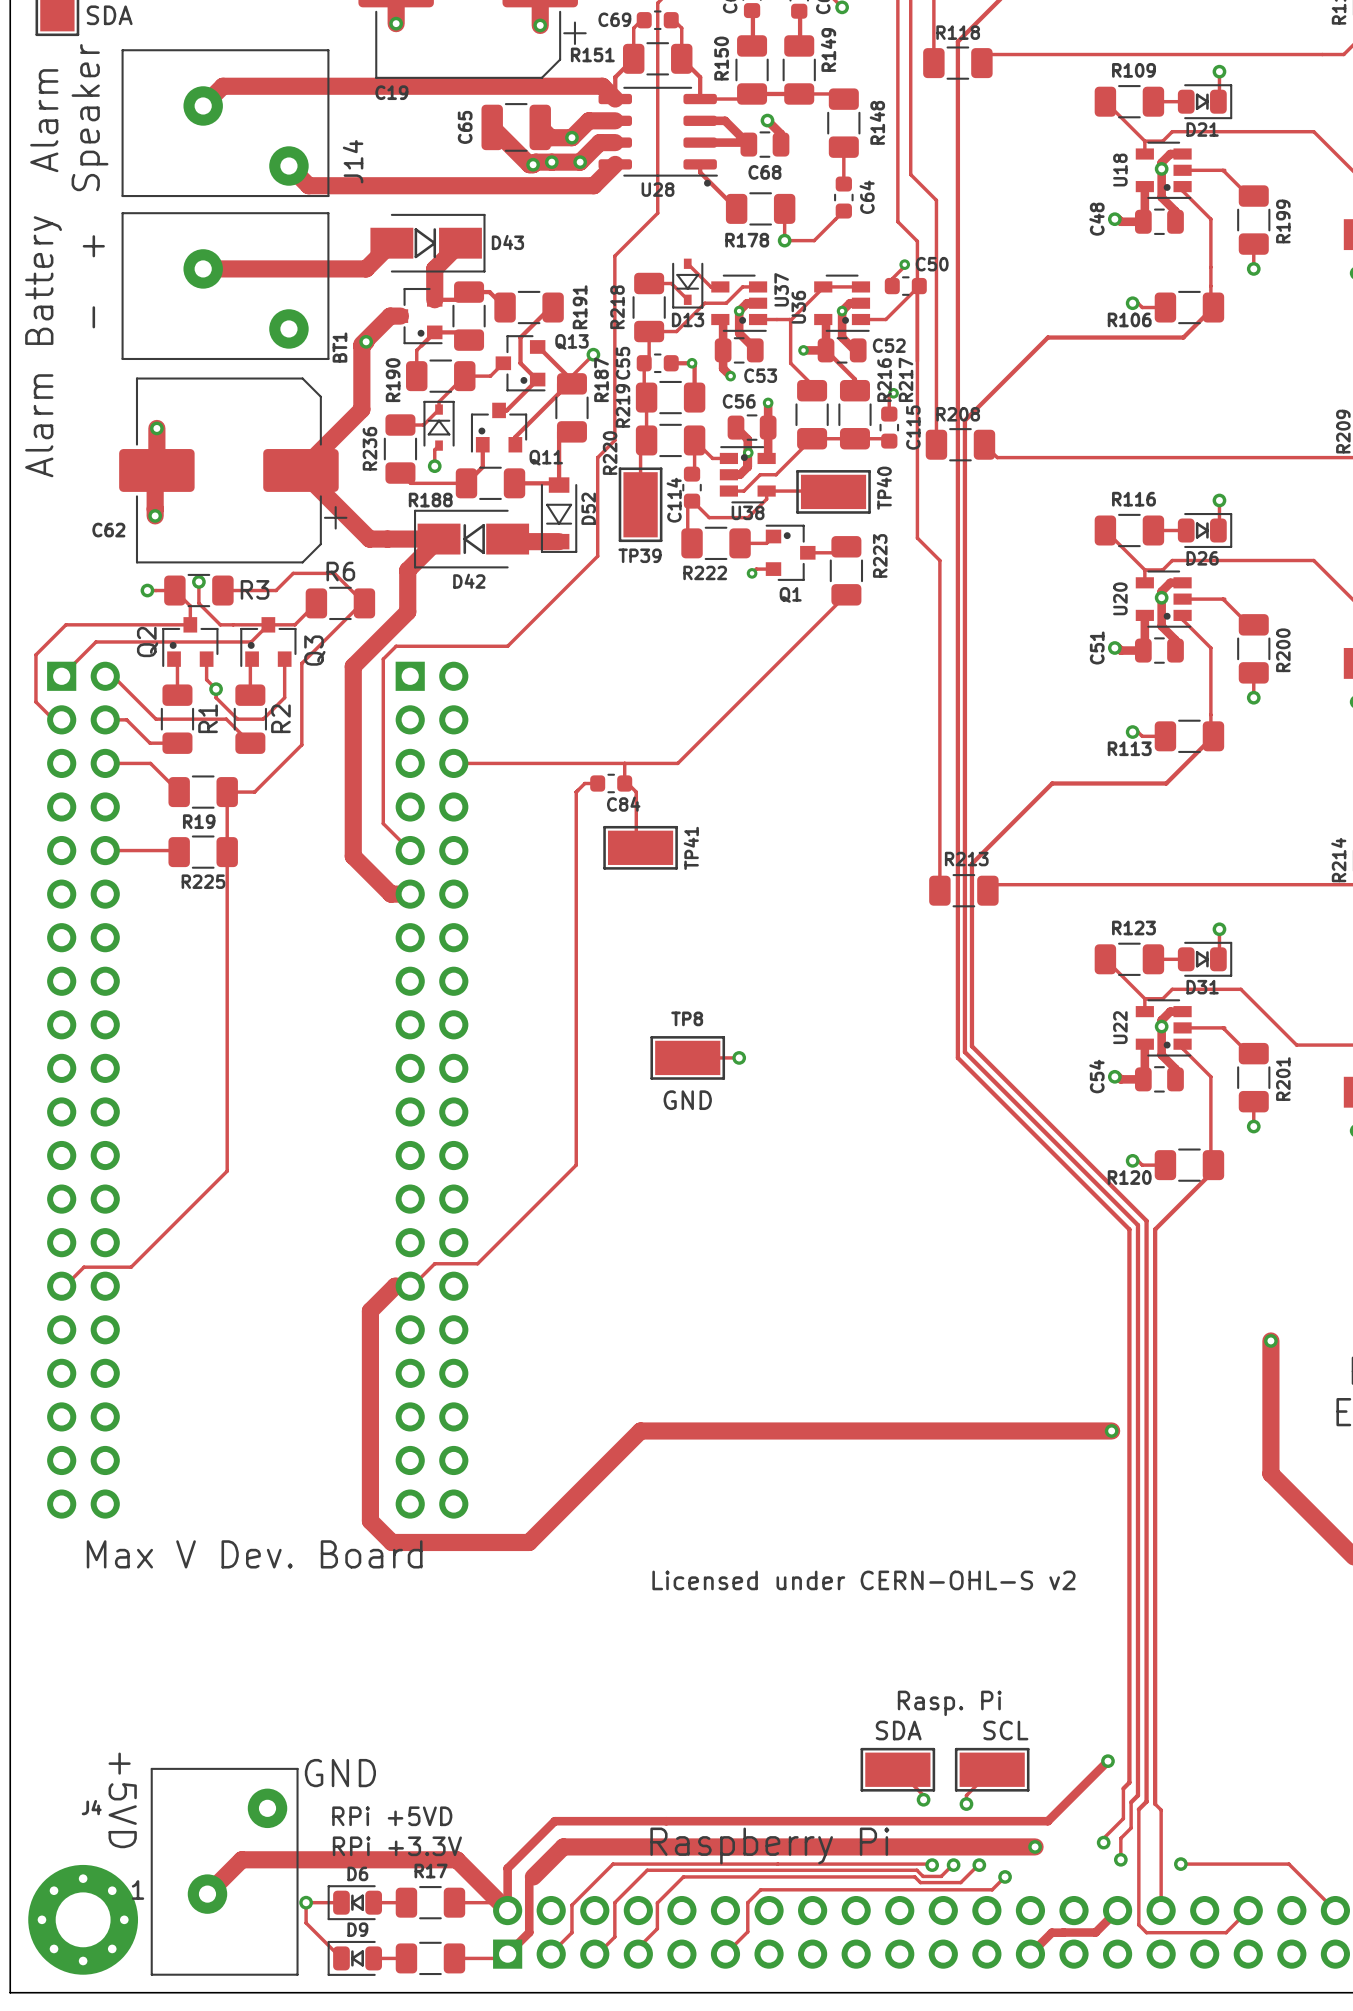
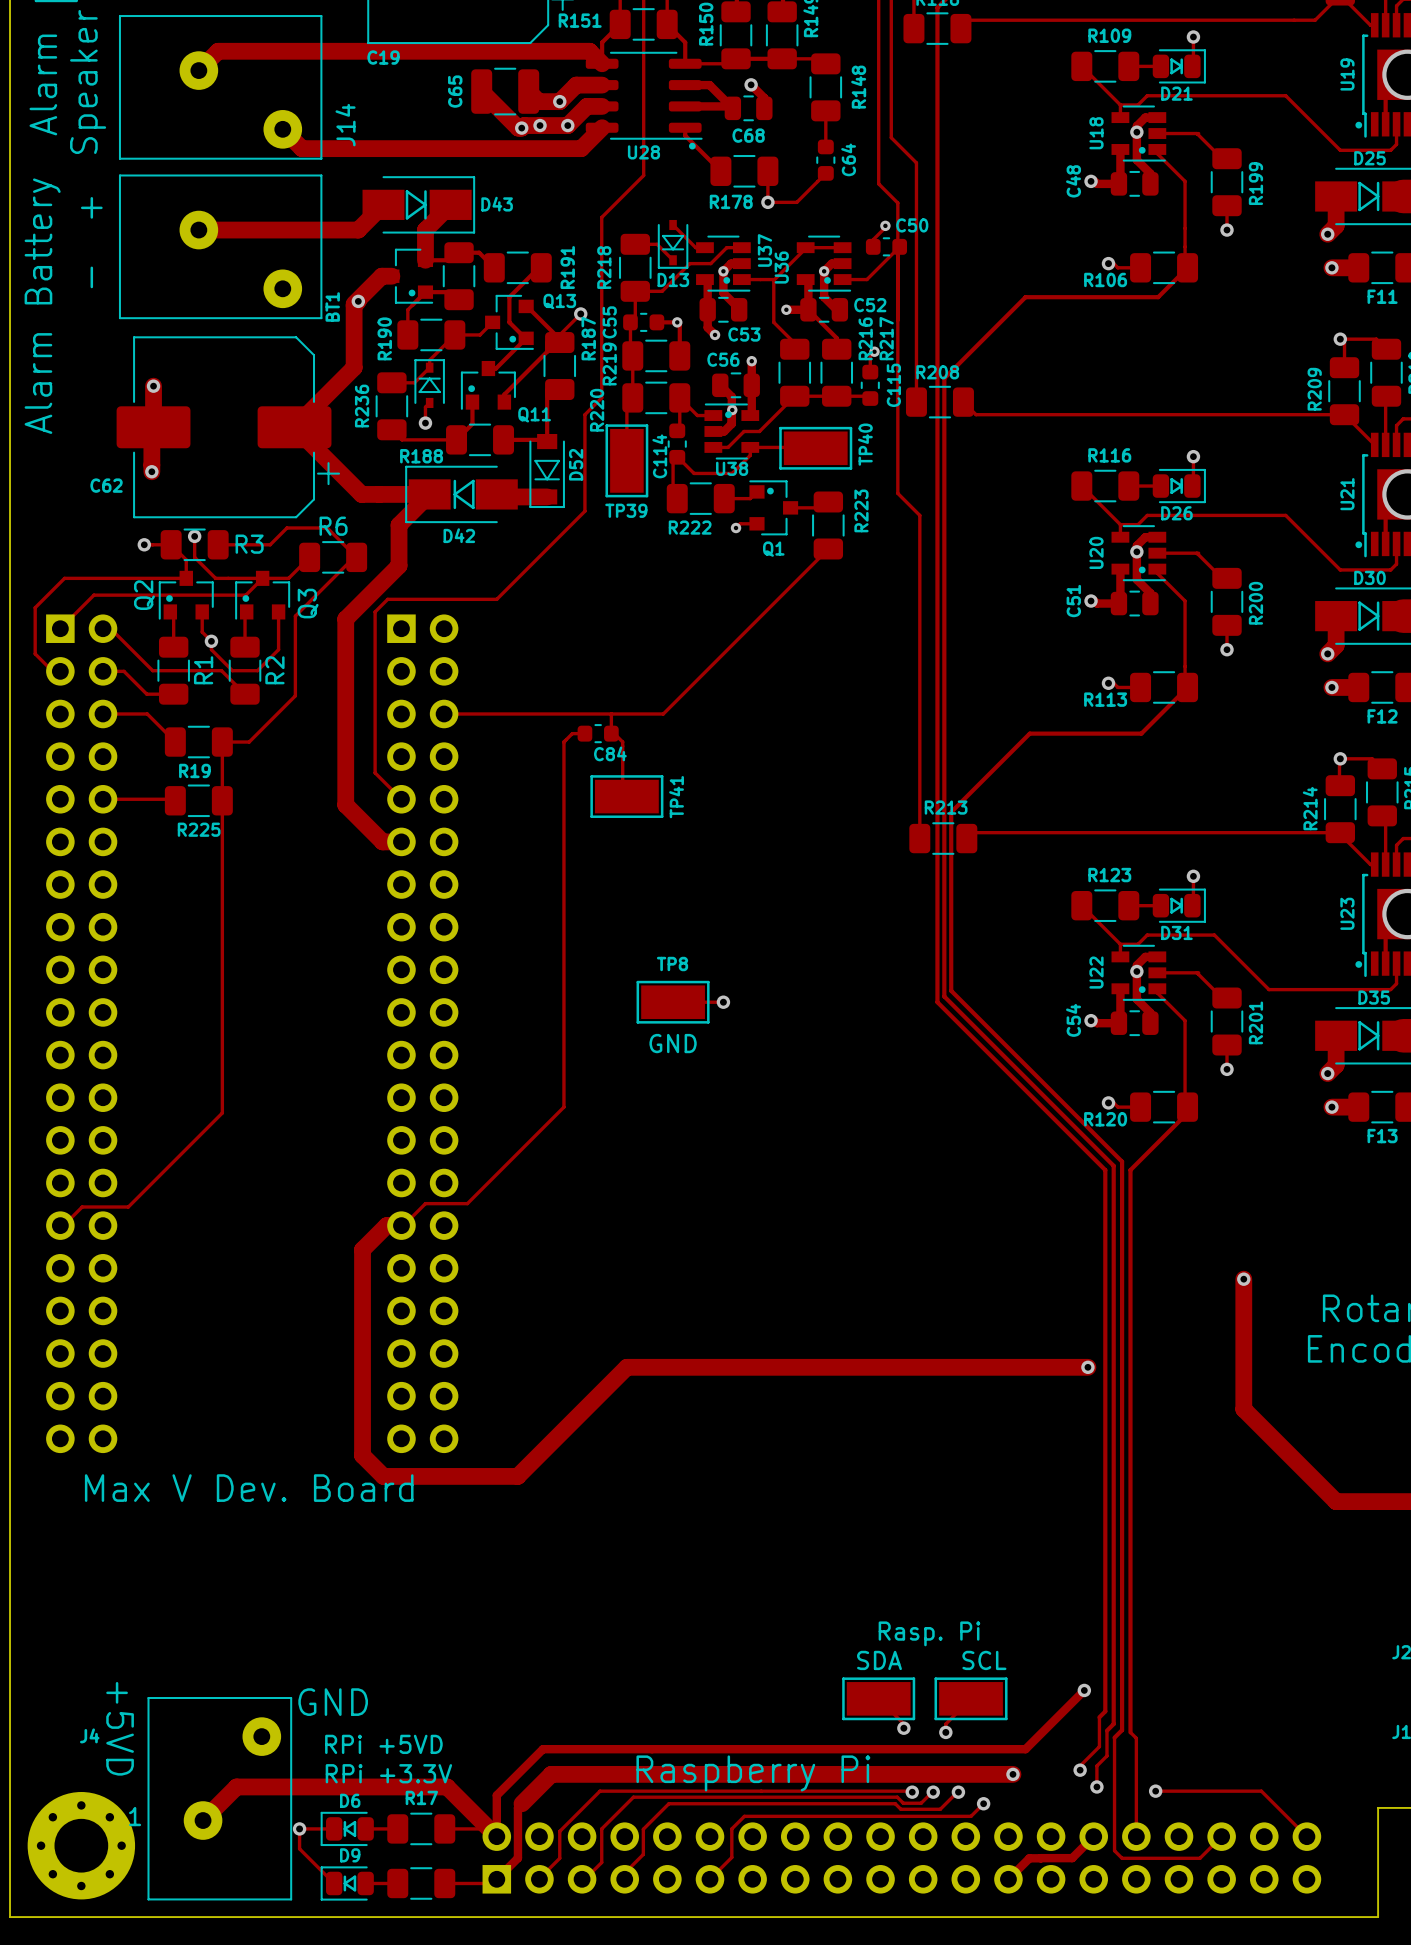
text: Licensed under CERN-OHL-S v2 (863, 1580) -> none

